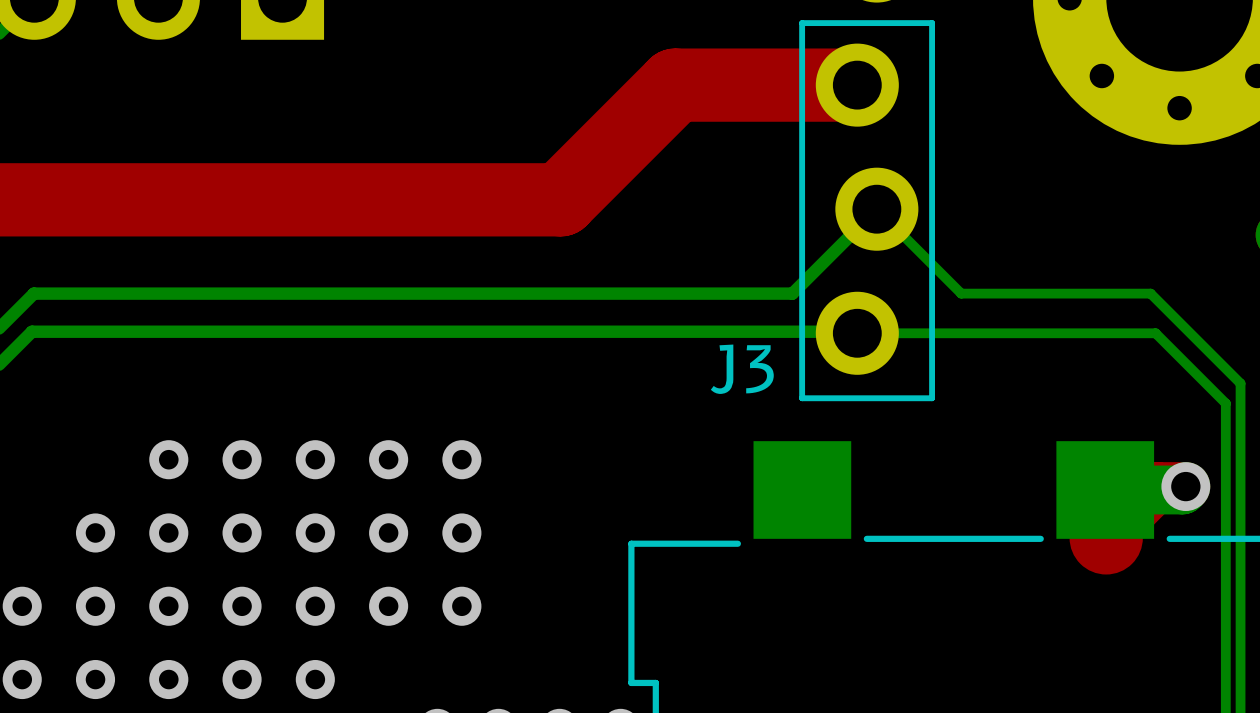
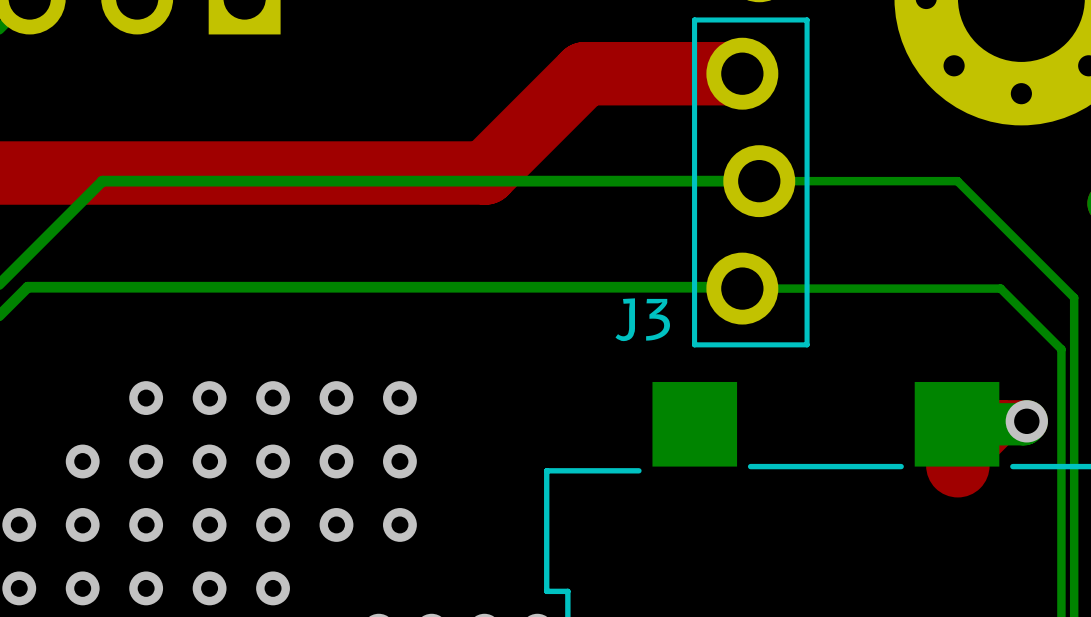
bottom track: none -> (759, 181) (957, 181) (1074, 297) (1074, 332)
bottom track: (33, 293) (792, 293) (876, 209) (961, 293) (1150, 293) (1240, 383) -> (29, 254) (102, 181) (744, 181)

